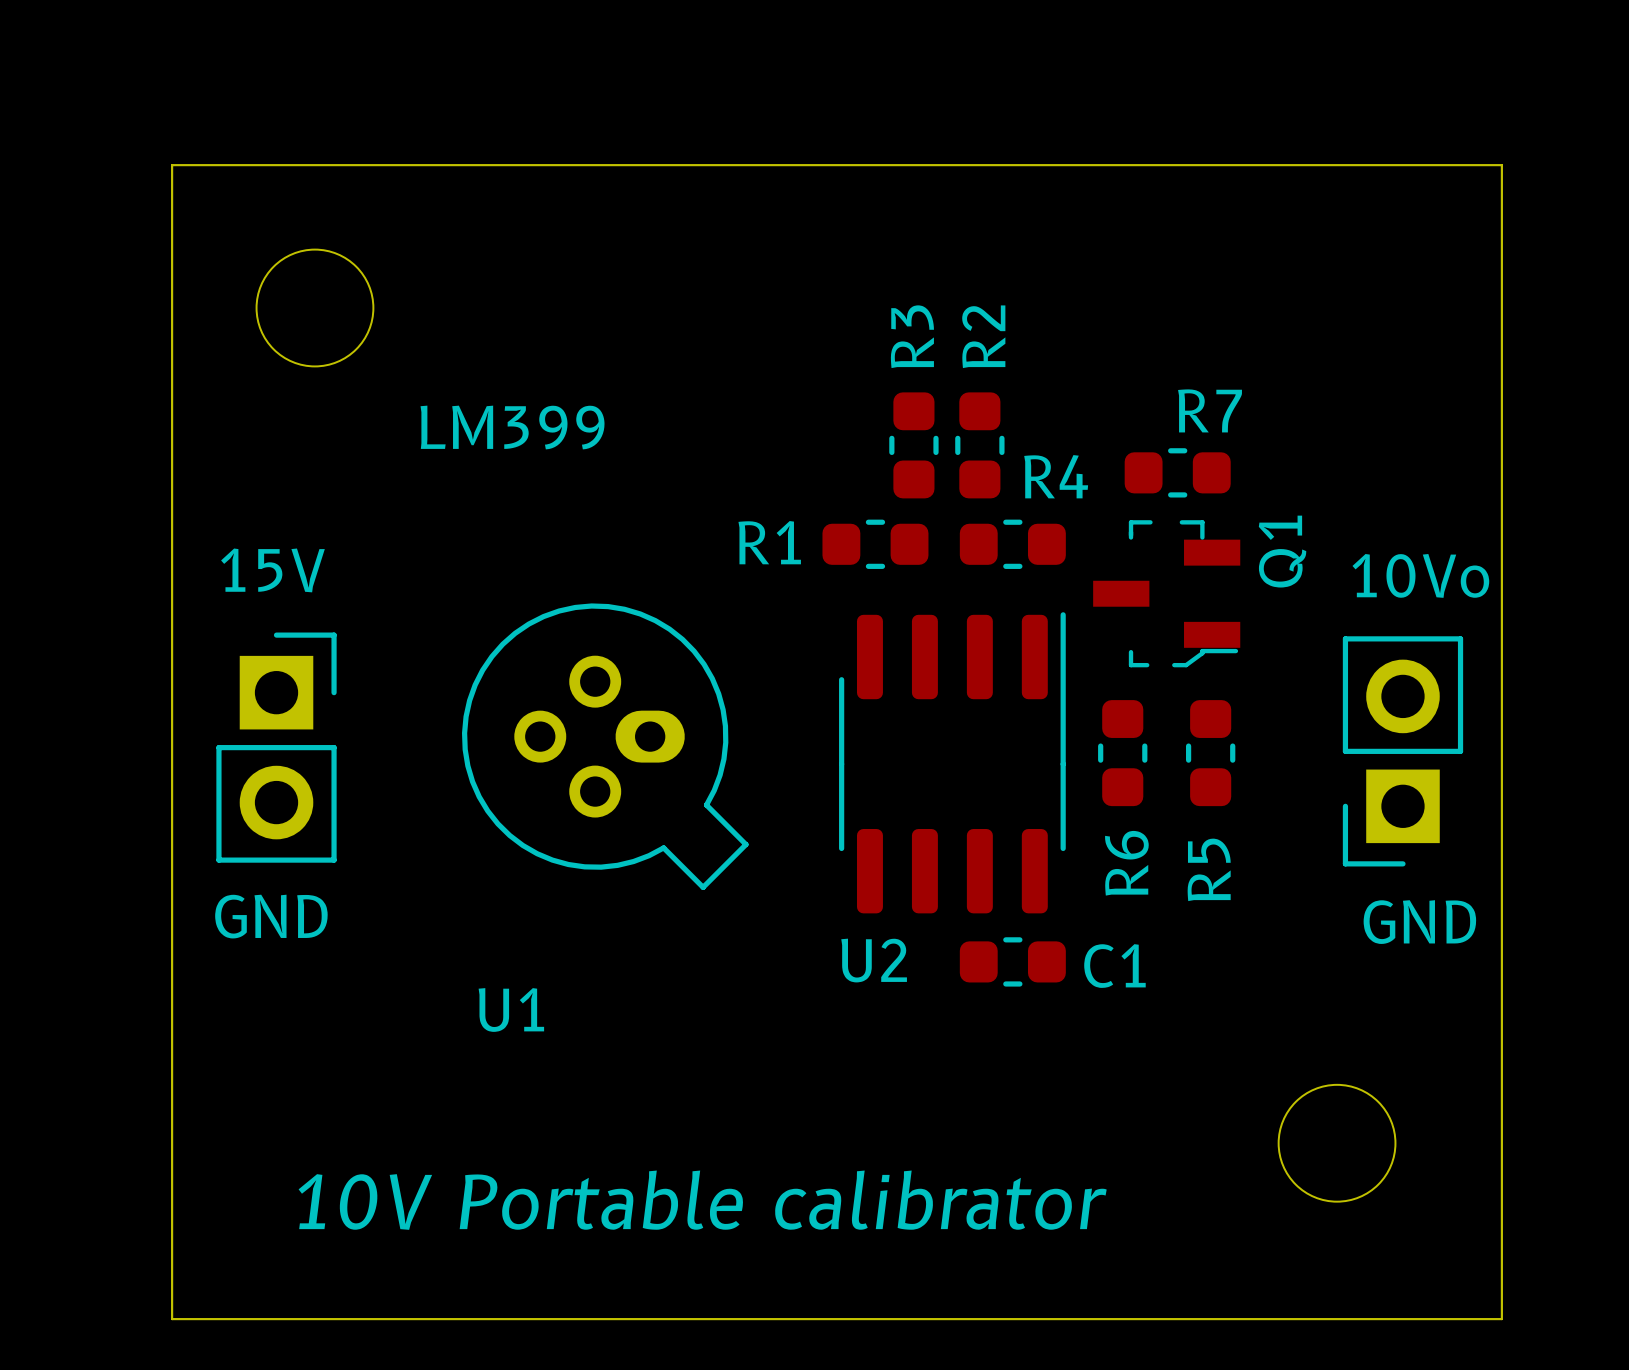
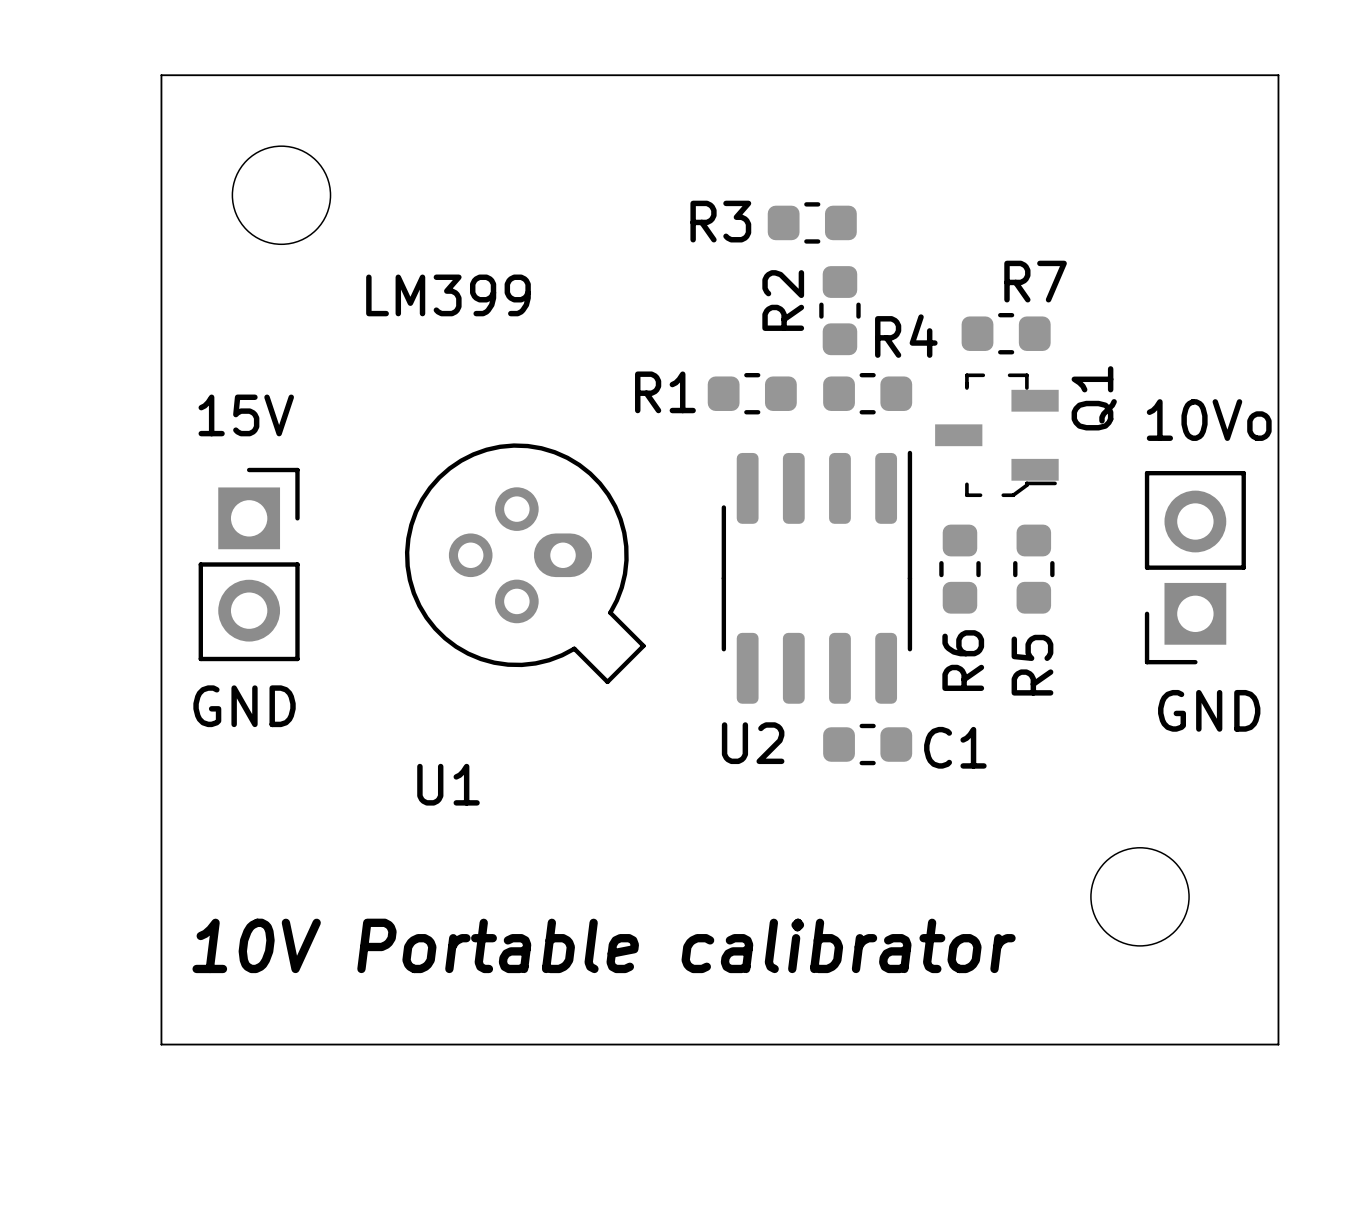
R3 name position: R3 (912, 336) -> R3 (720, 221)
R2 name position: R2 (983, 336) -> R2 (783, 300)
R3 rotation: 0° (913, 445) -> 90° clockwise (812, 222)
R3 position: (913, 445) -> (812, 222)

